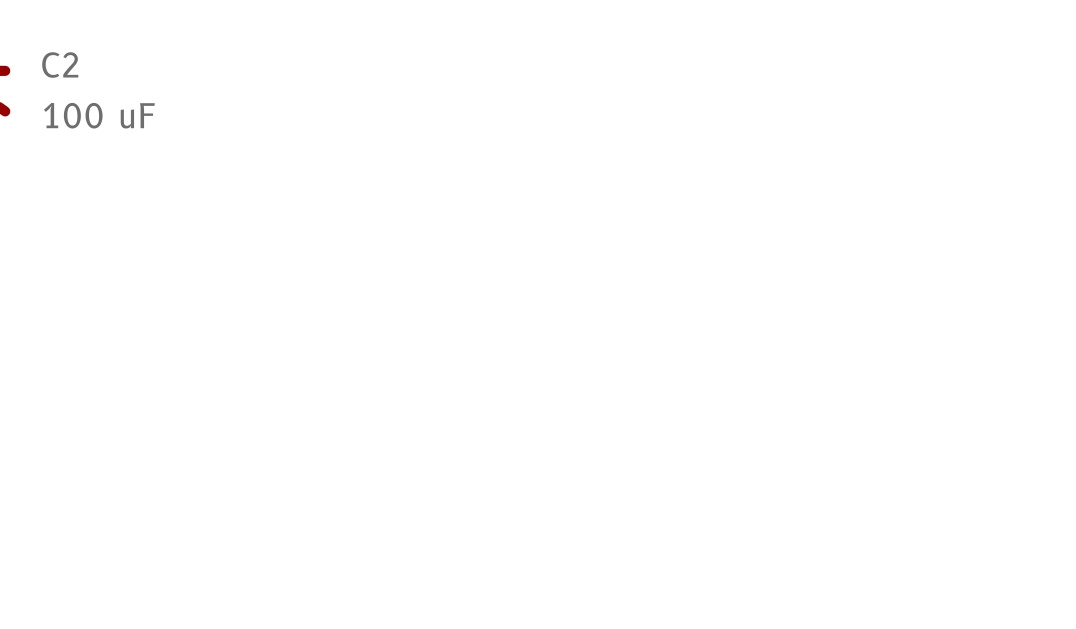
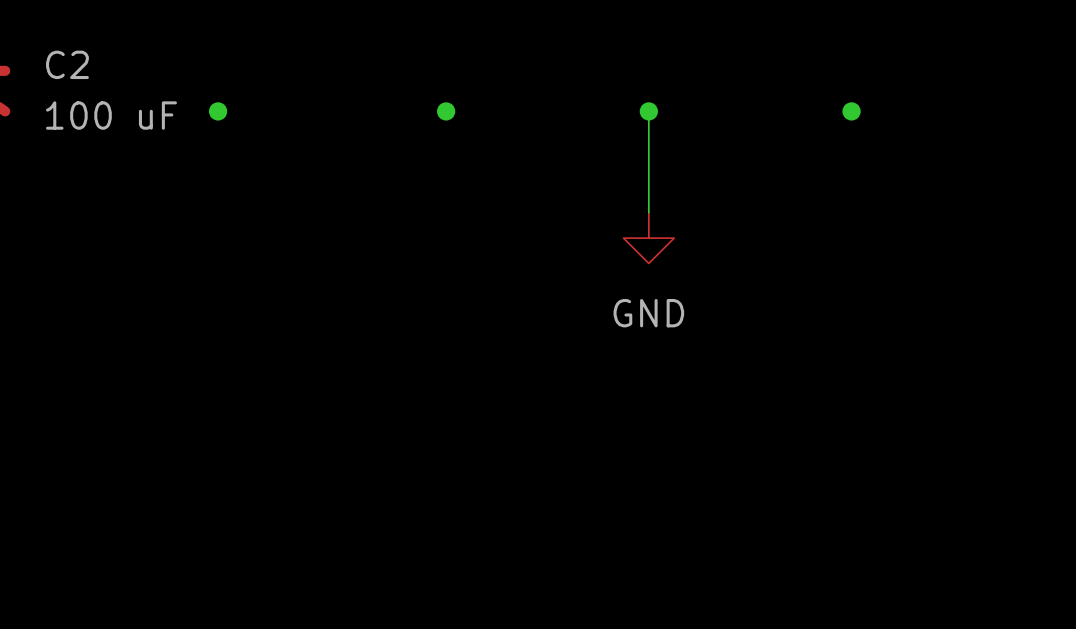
junction: none -> (218, 111)
junction: none -> (446, 111)
wire: none -> (648, 111) (648, 212)
junction: none -> (648, 111)
junction: none -> (851, 111)
power symbol: none -> GND (648, 238)

